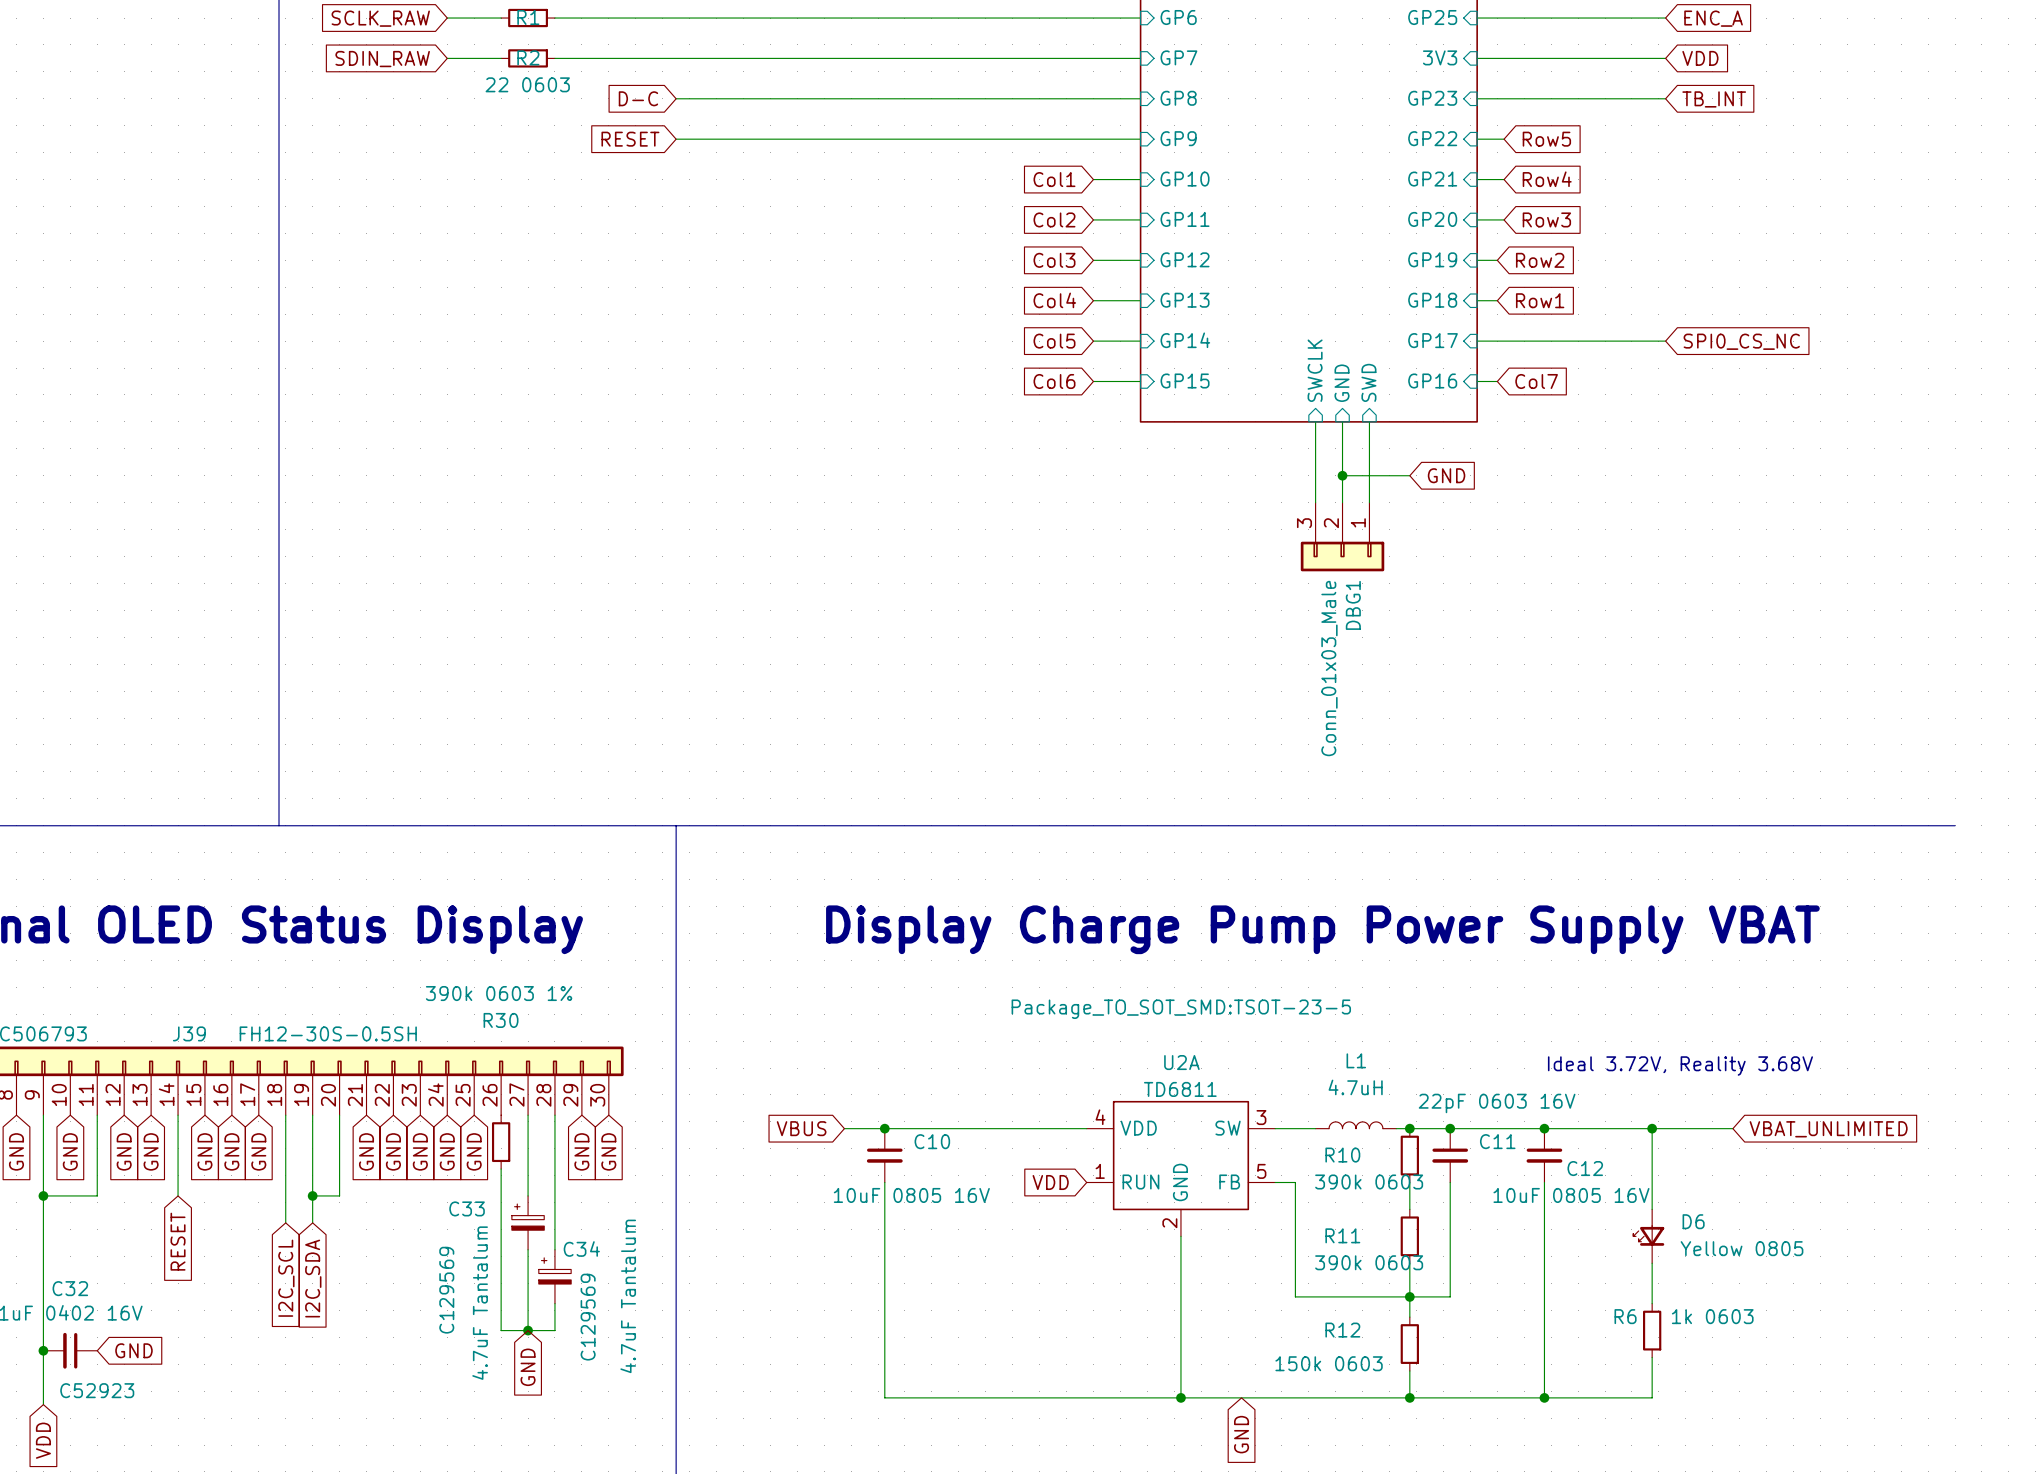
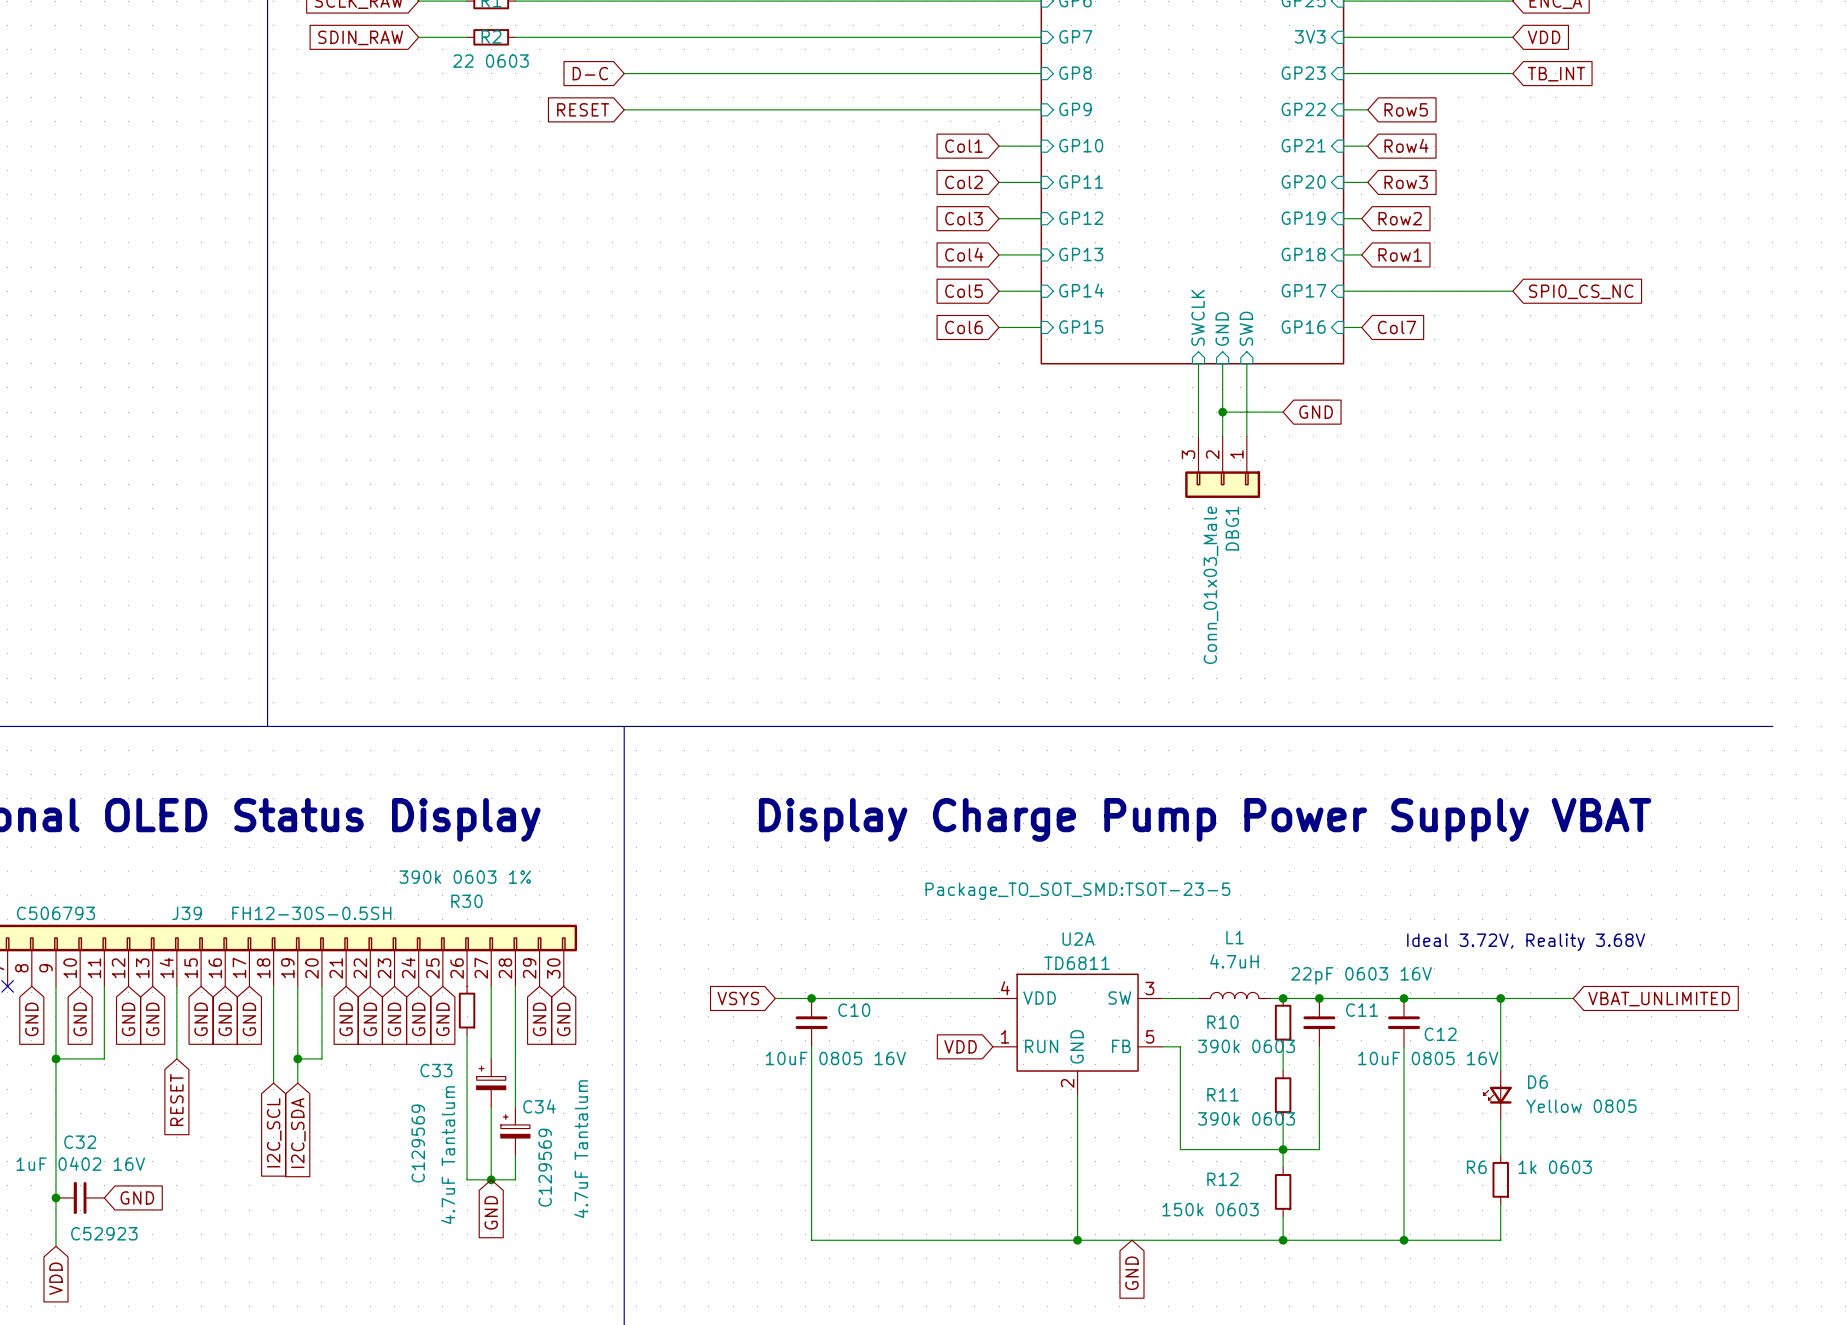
global label: VBUS (801, 1128) -> VSYS (738, 998)

